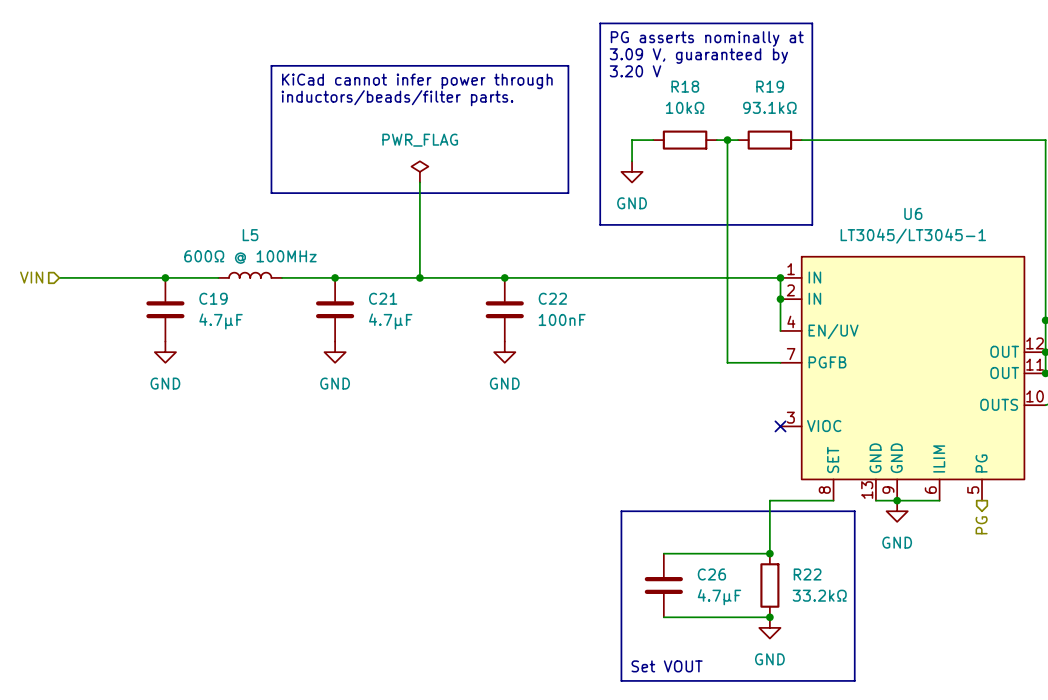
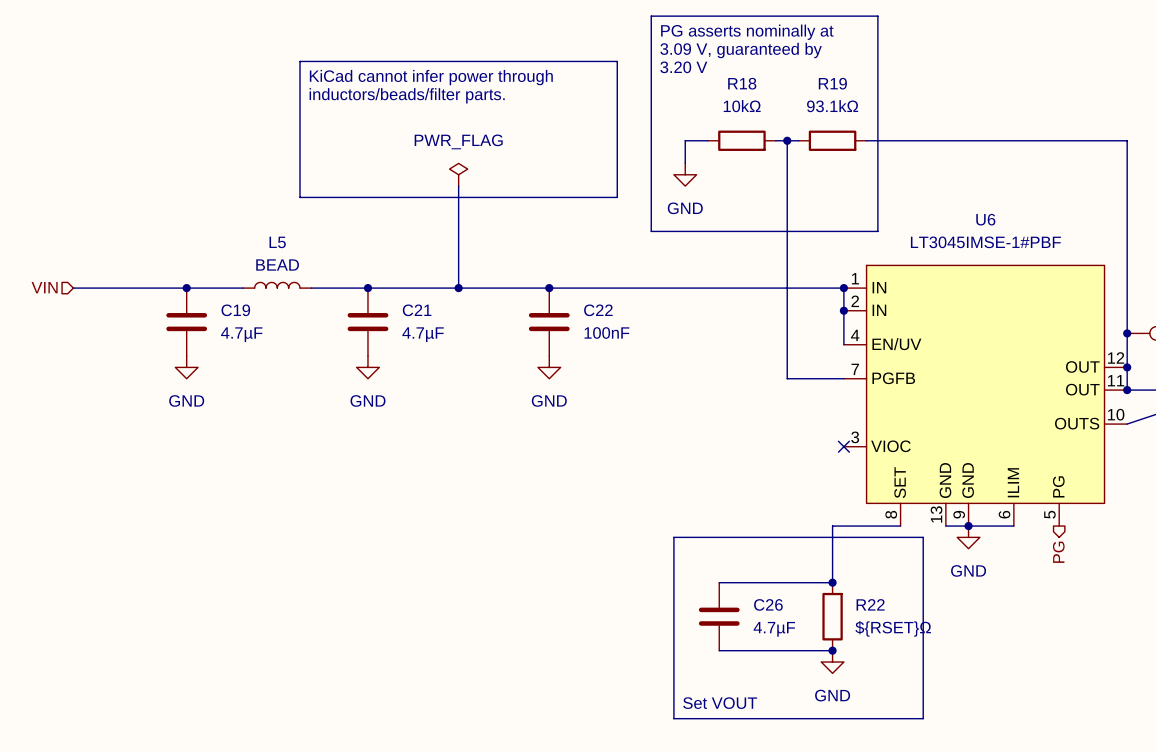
U6 value: LT3045/LT3045-1 (913, 236) -> LT3045IMSE-1#PBF (985, 242)
L5 value: 600Ω @ 100MHz (250, 257) -> BEAD (277, 265)
R22 value: 33.2kΩ (819, 595) -> ${RSET}Ω (893, 628)

